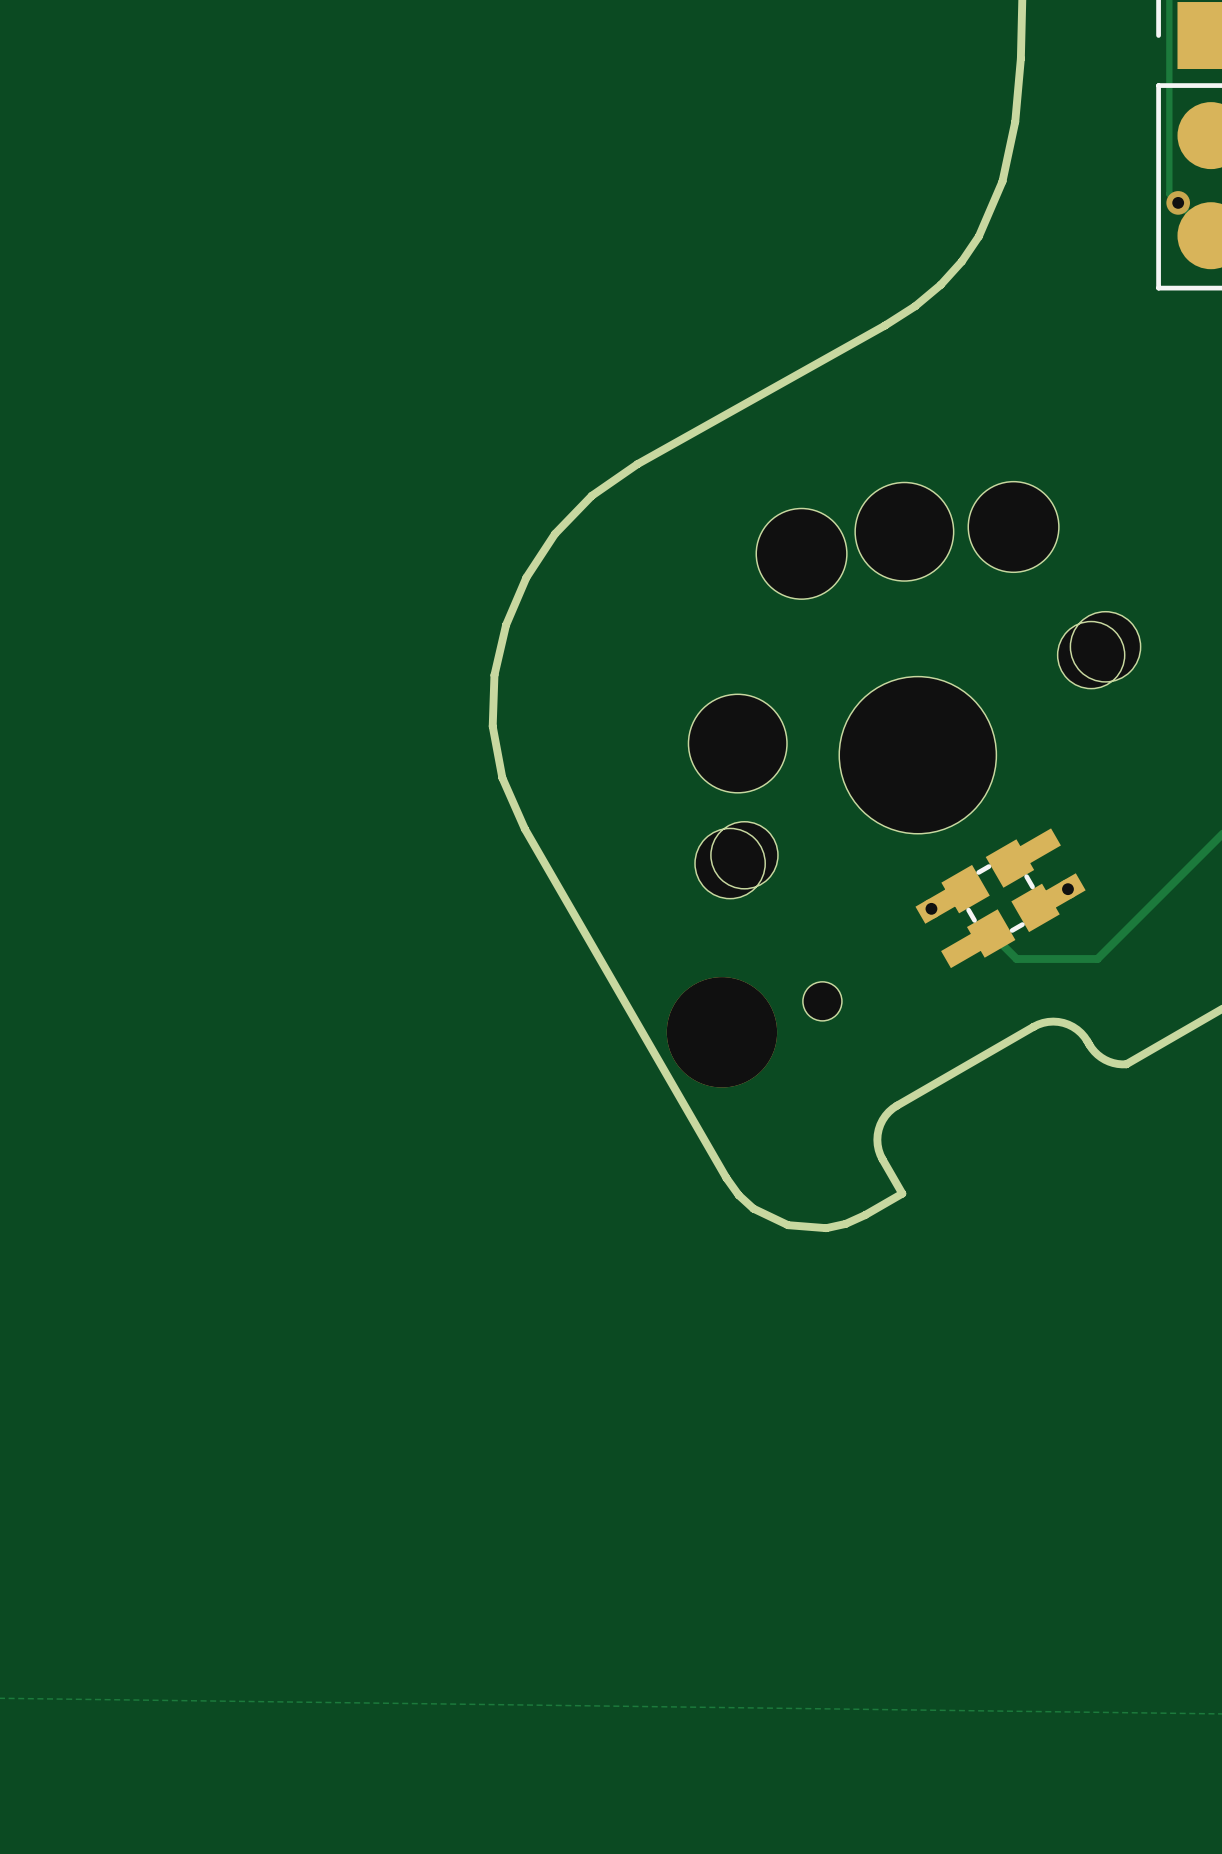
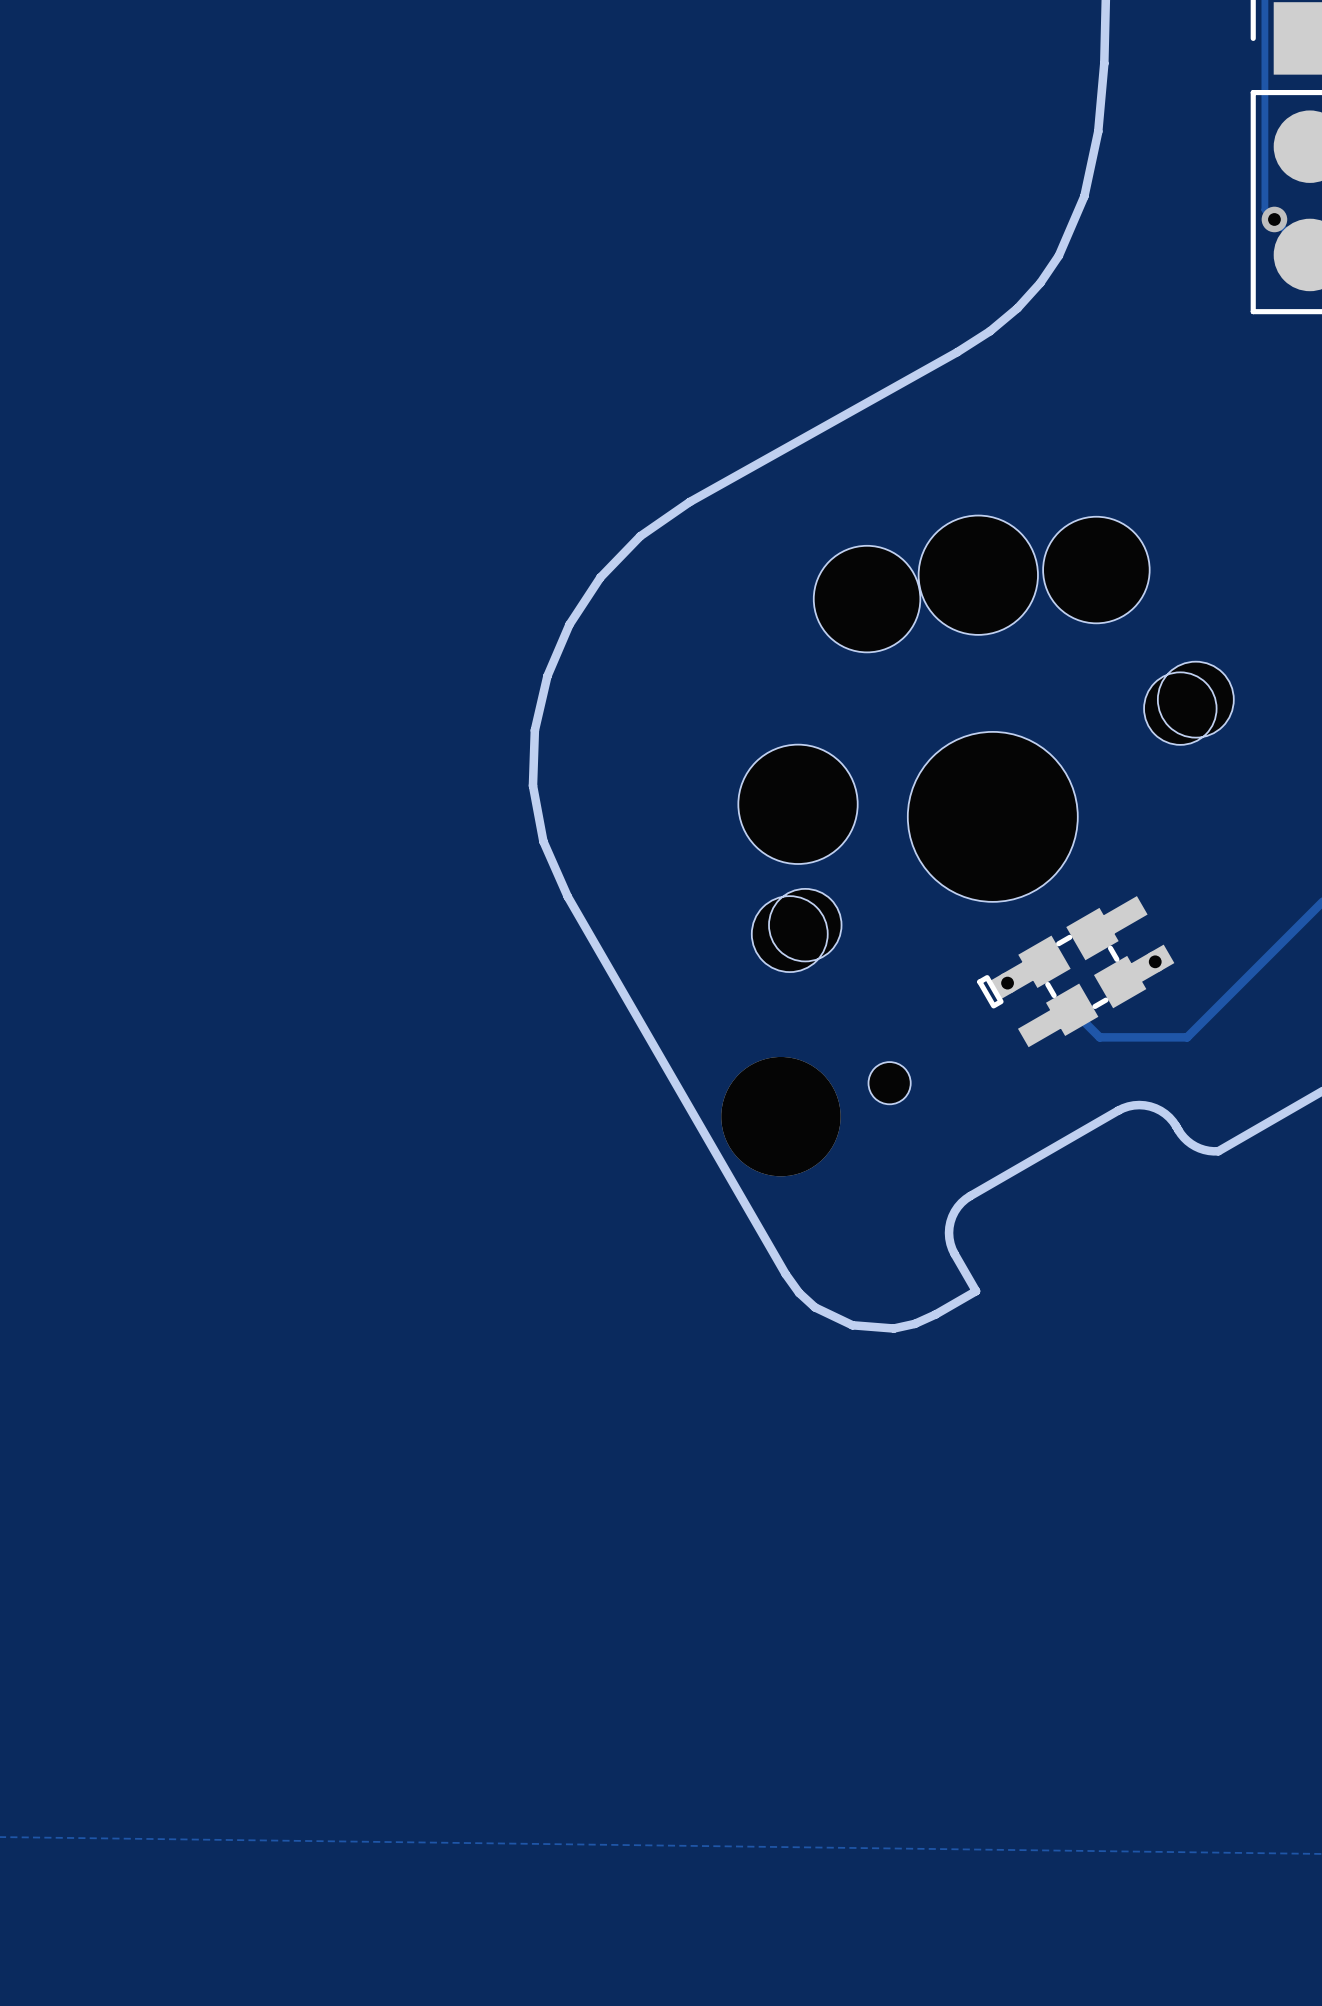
part footprint: [688, 481, 1141, 1021] -> [738, 515, 1234, 1105]

